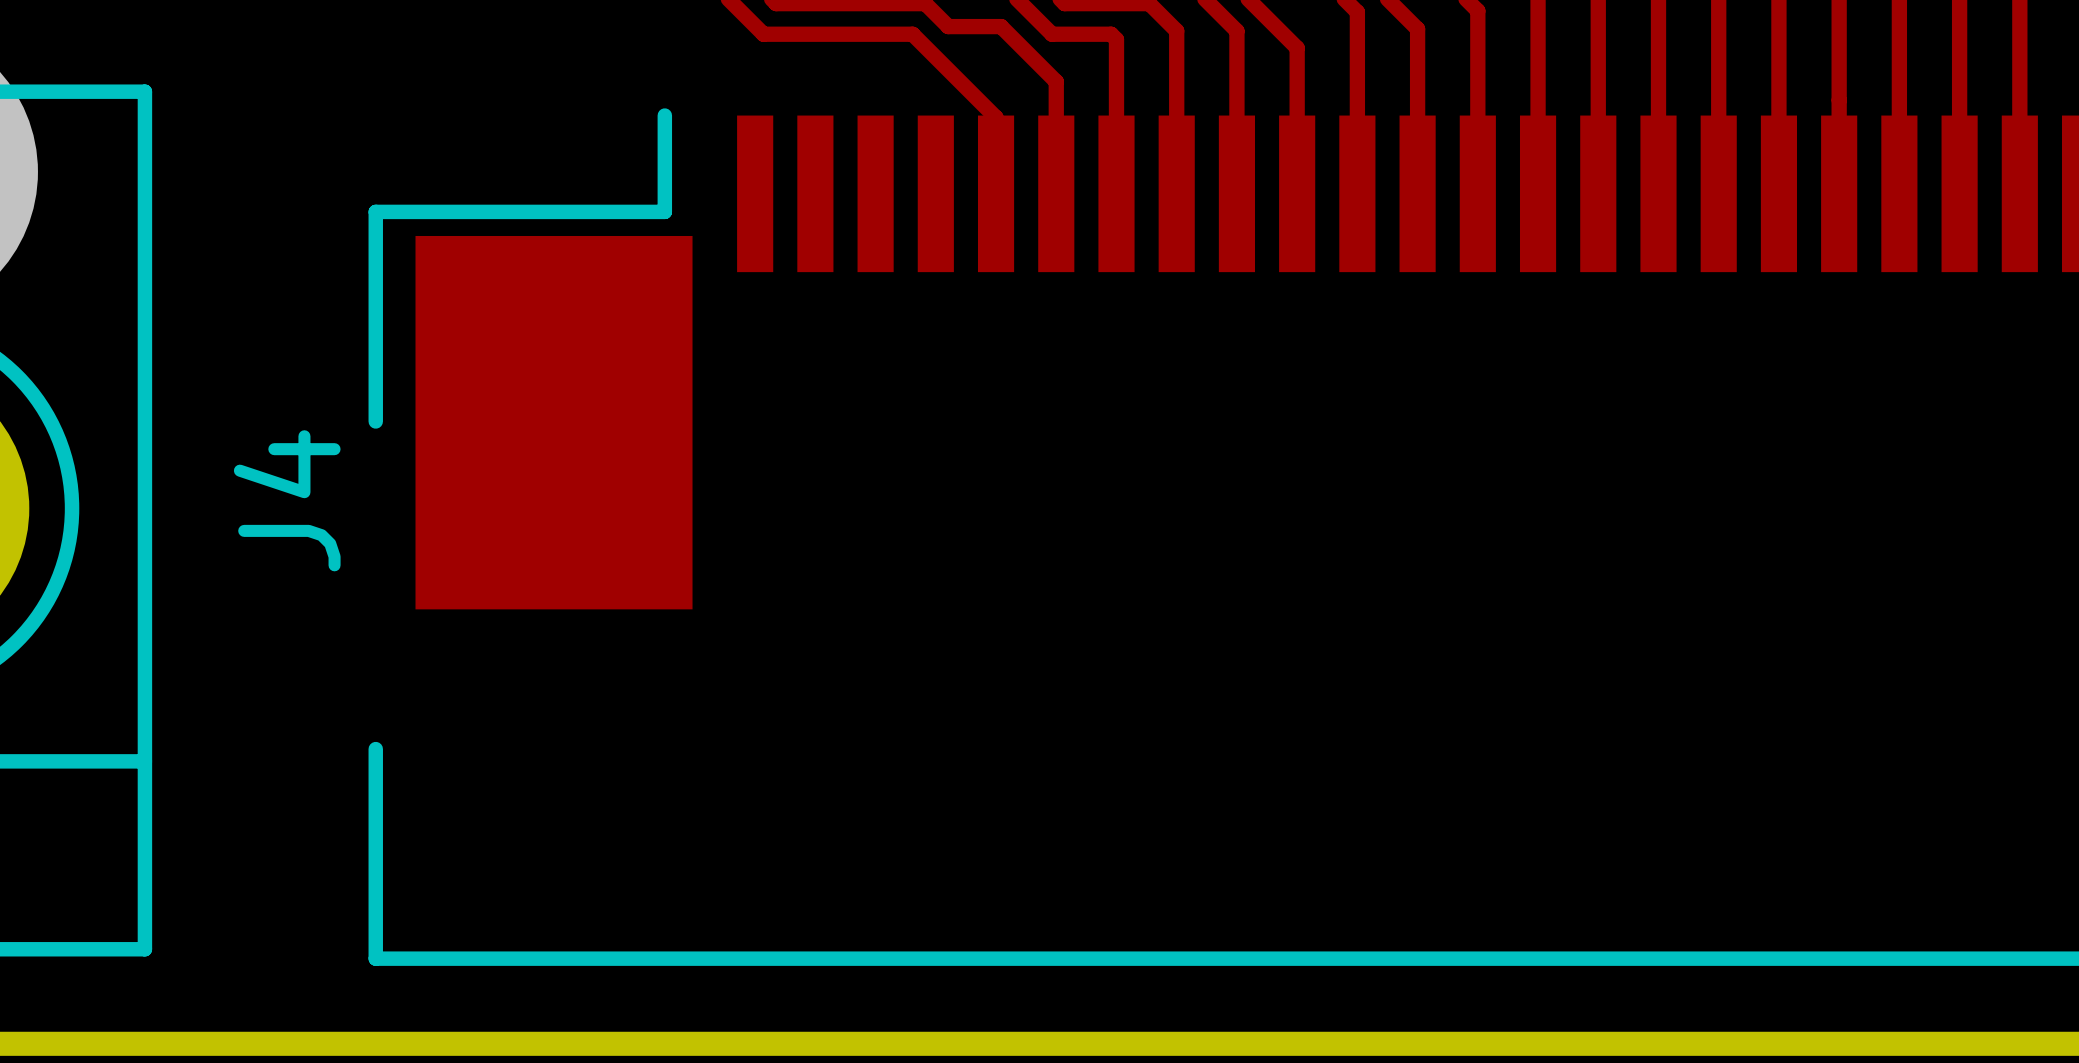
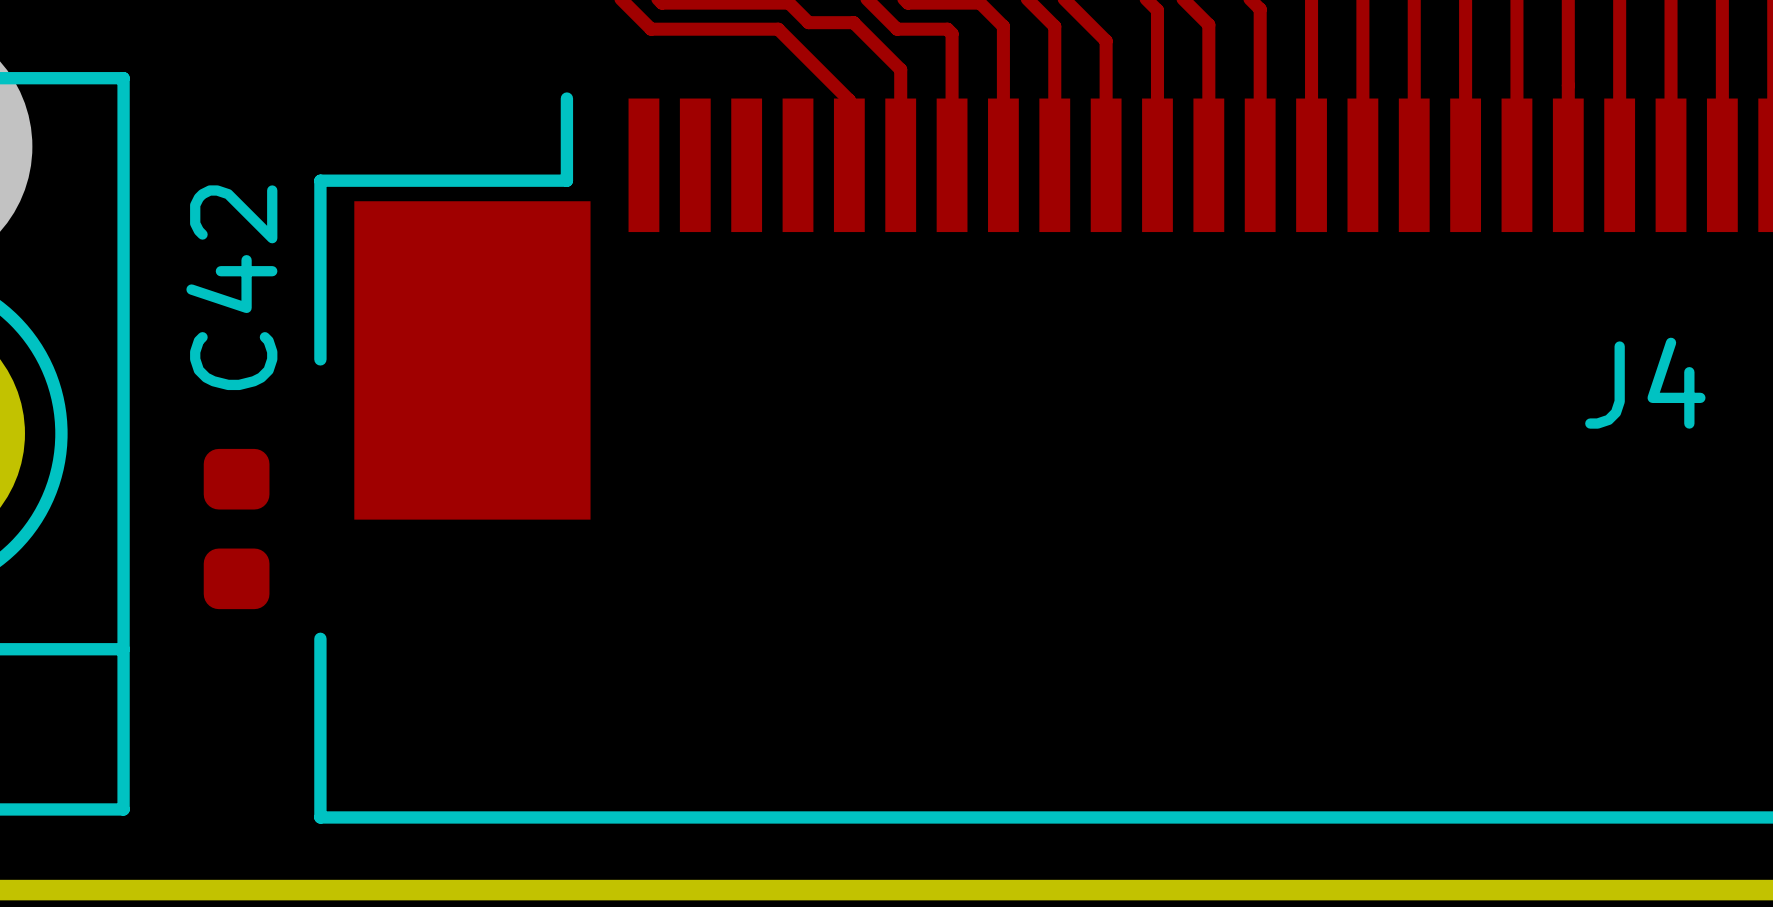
J4 name rotation: 0° (287, 500) -> 90° clockwise (1645, 383)
J4 name position: J4 (287, 500) -> J4 (1645, 383)
C42: none -> (236, 529)

